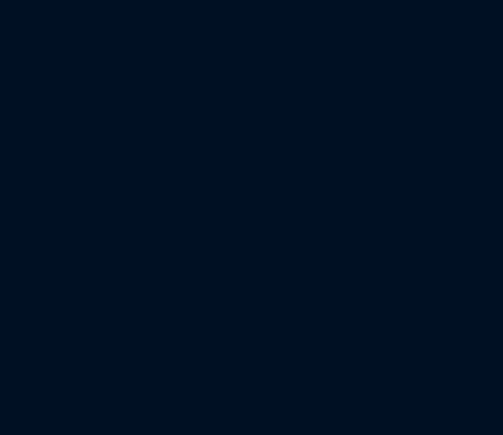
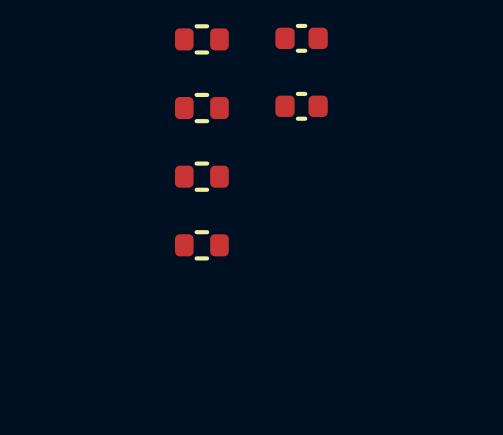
part: none -> (301, 38)
part: none -> (201, 39)
part: none -> (301, 106)
part: none -> (201, 108)
part: none -> (201, 176)
part: none -> (201, 245)

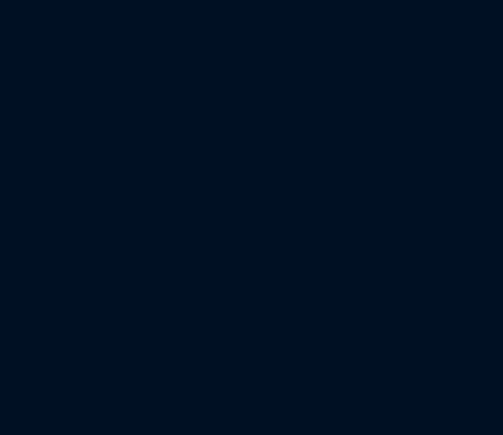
part: (301, 38) -> none
part: (201, 39) -> none
part: (301, 106) -> none
part: (201, 108) -> none
part: (201, 176) -> none
part: (201, 245) -> none

